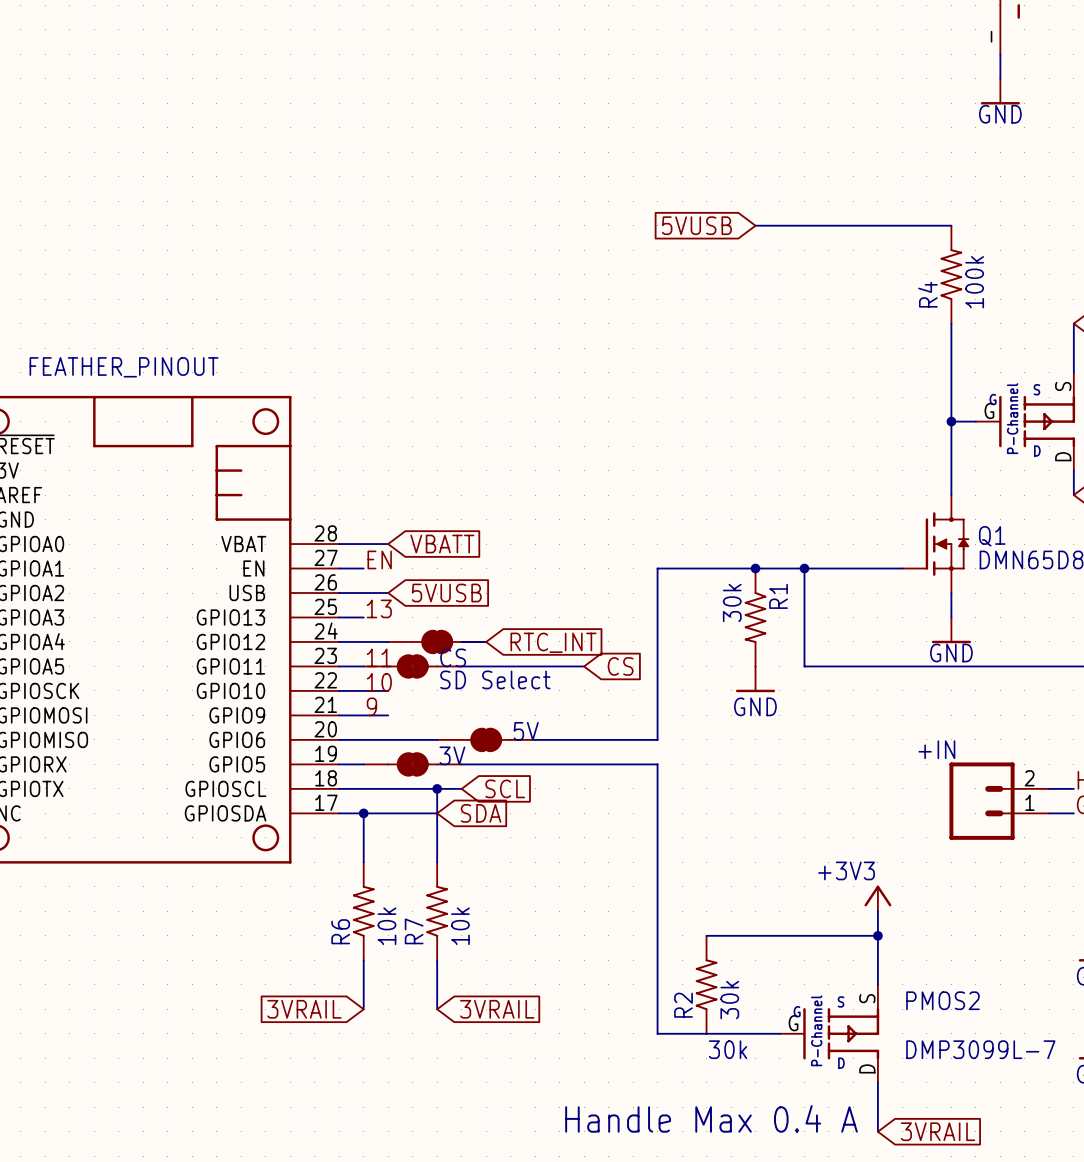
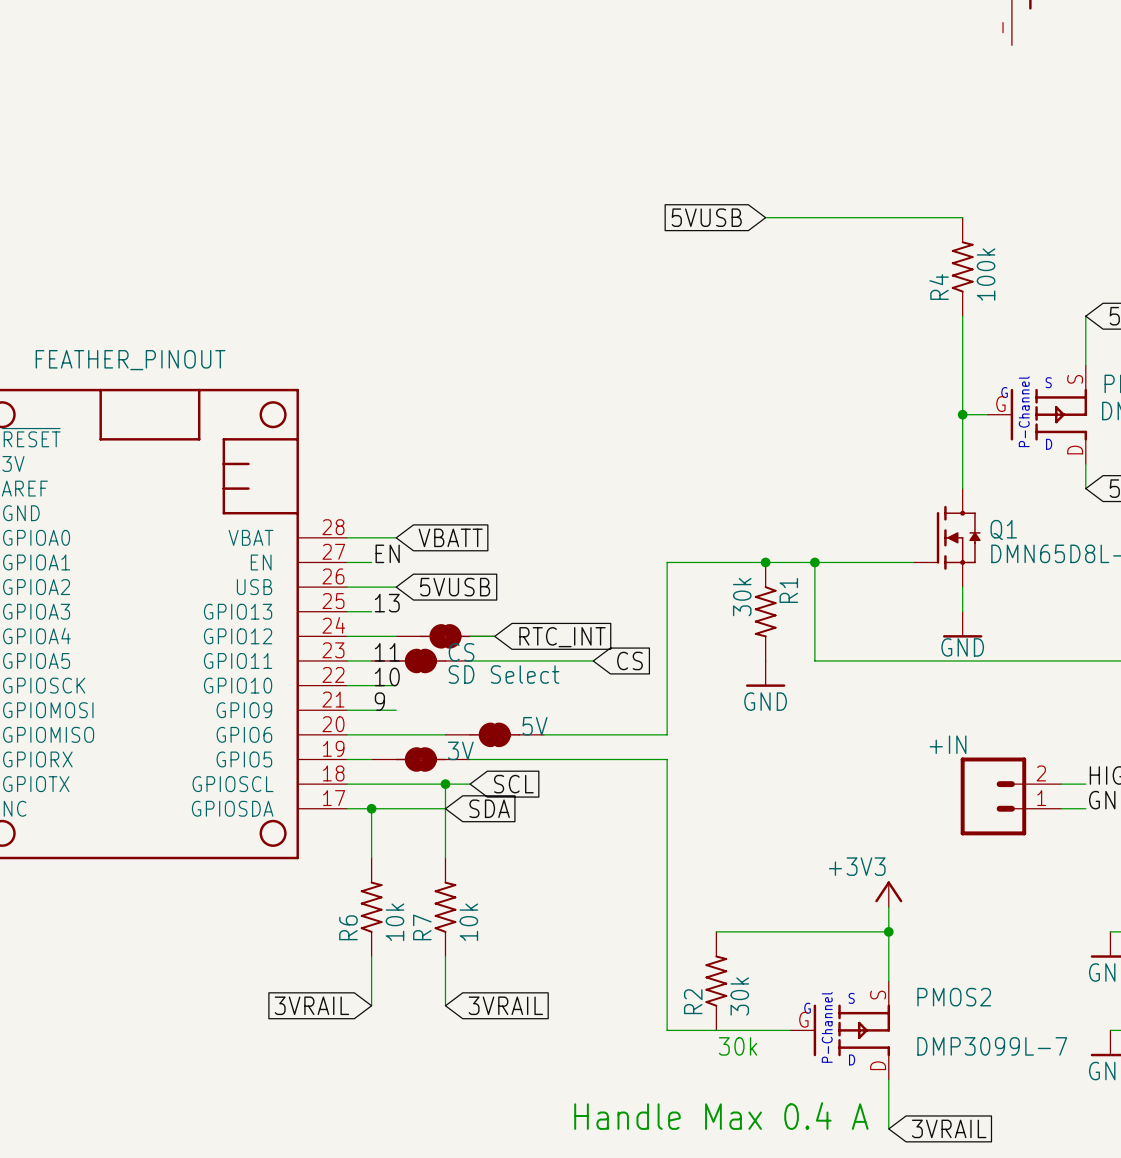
wire: (1000, 54) (1000, 78) -> none
power symbol: GND (1000, 91) -> none

